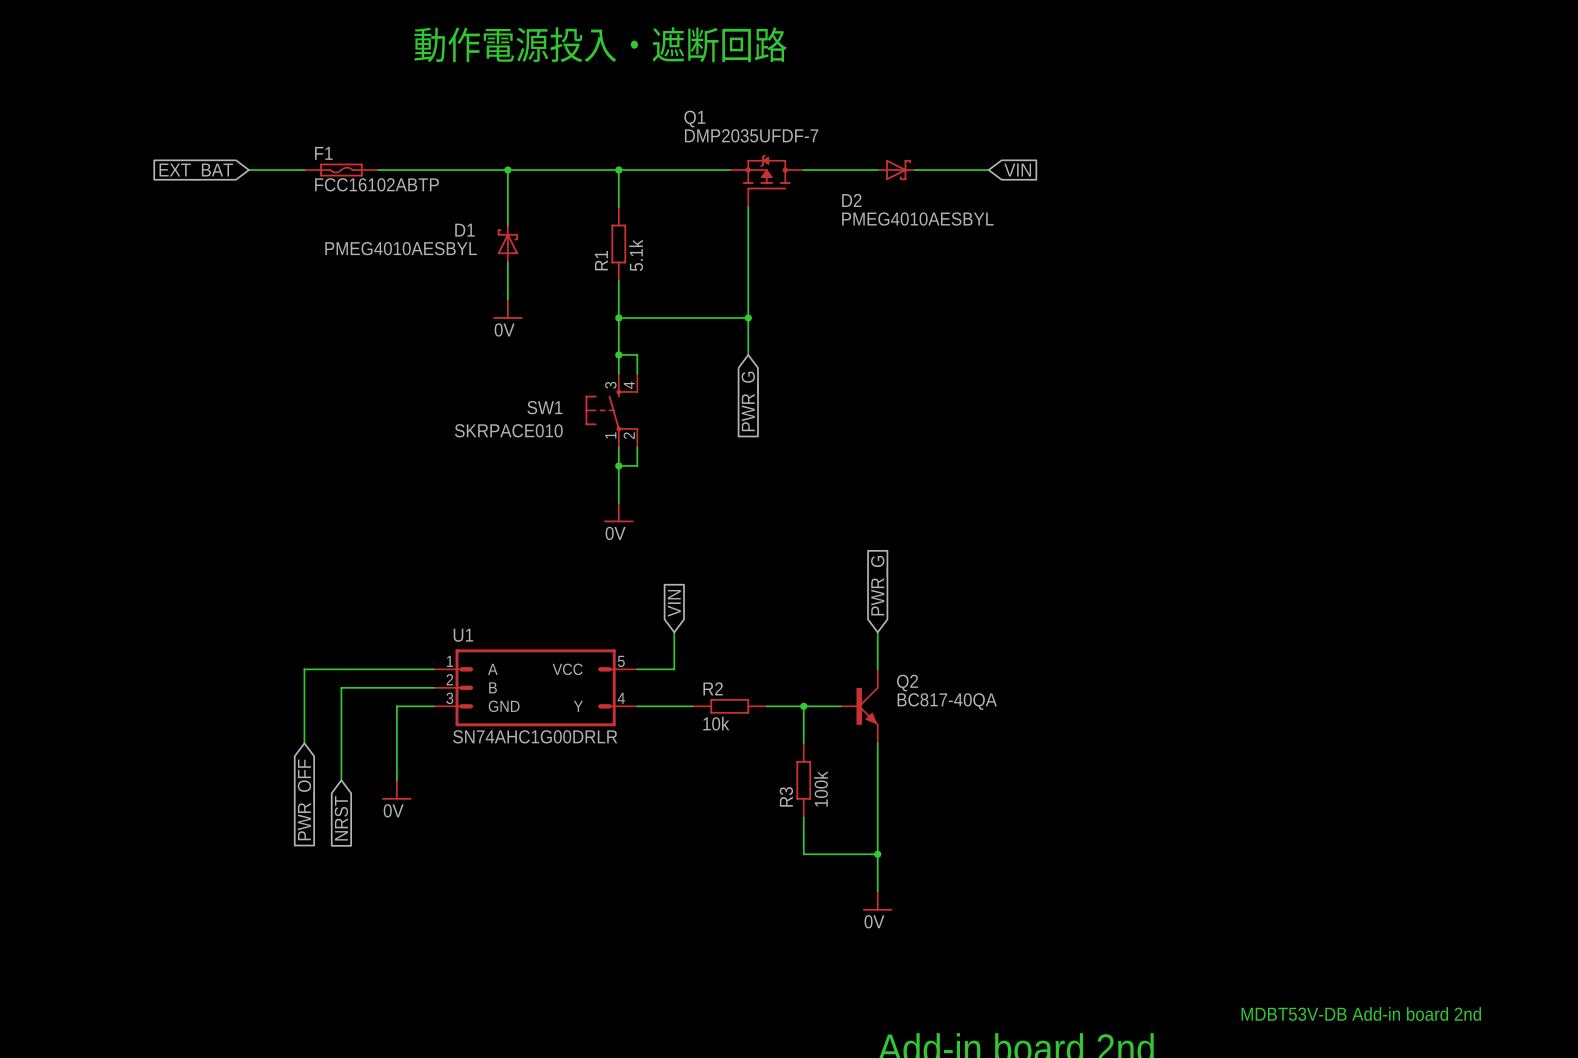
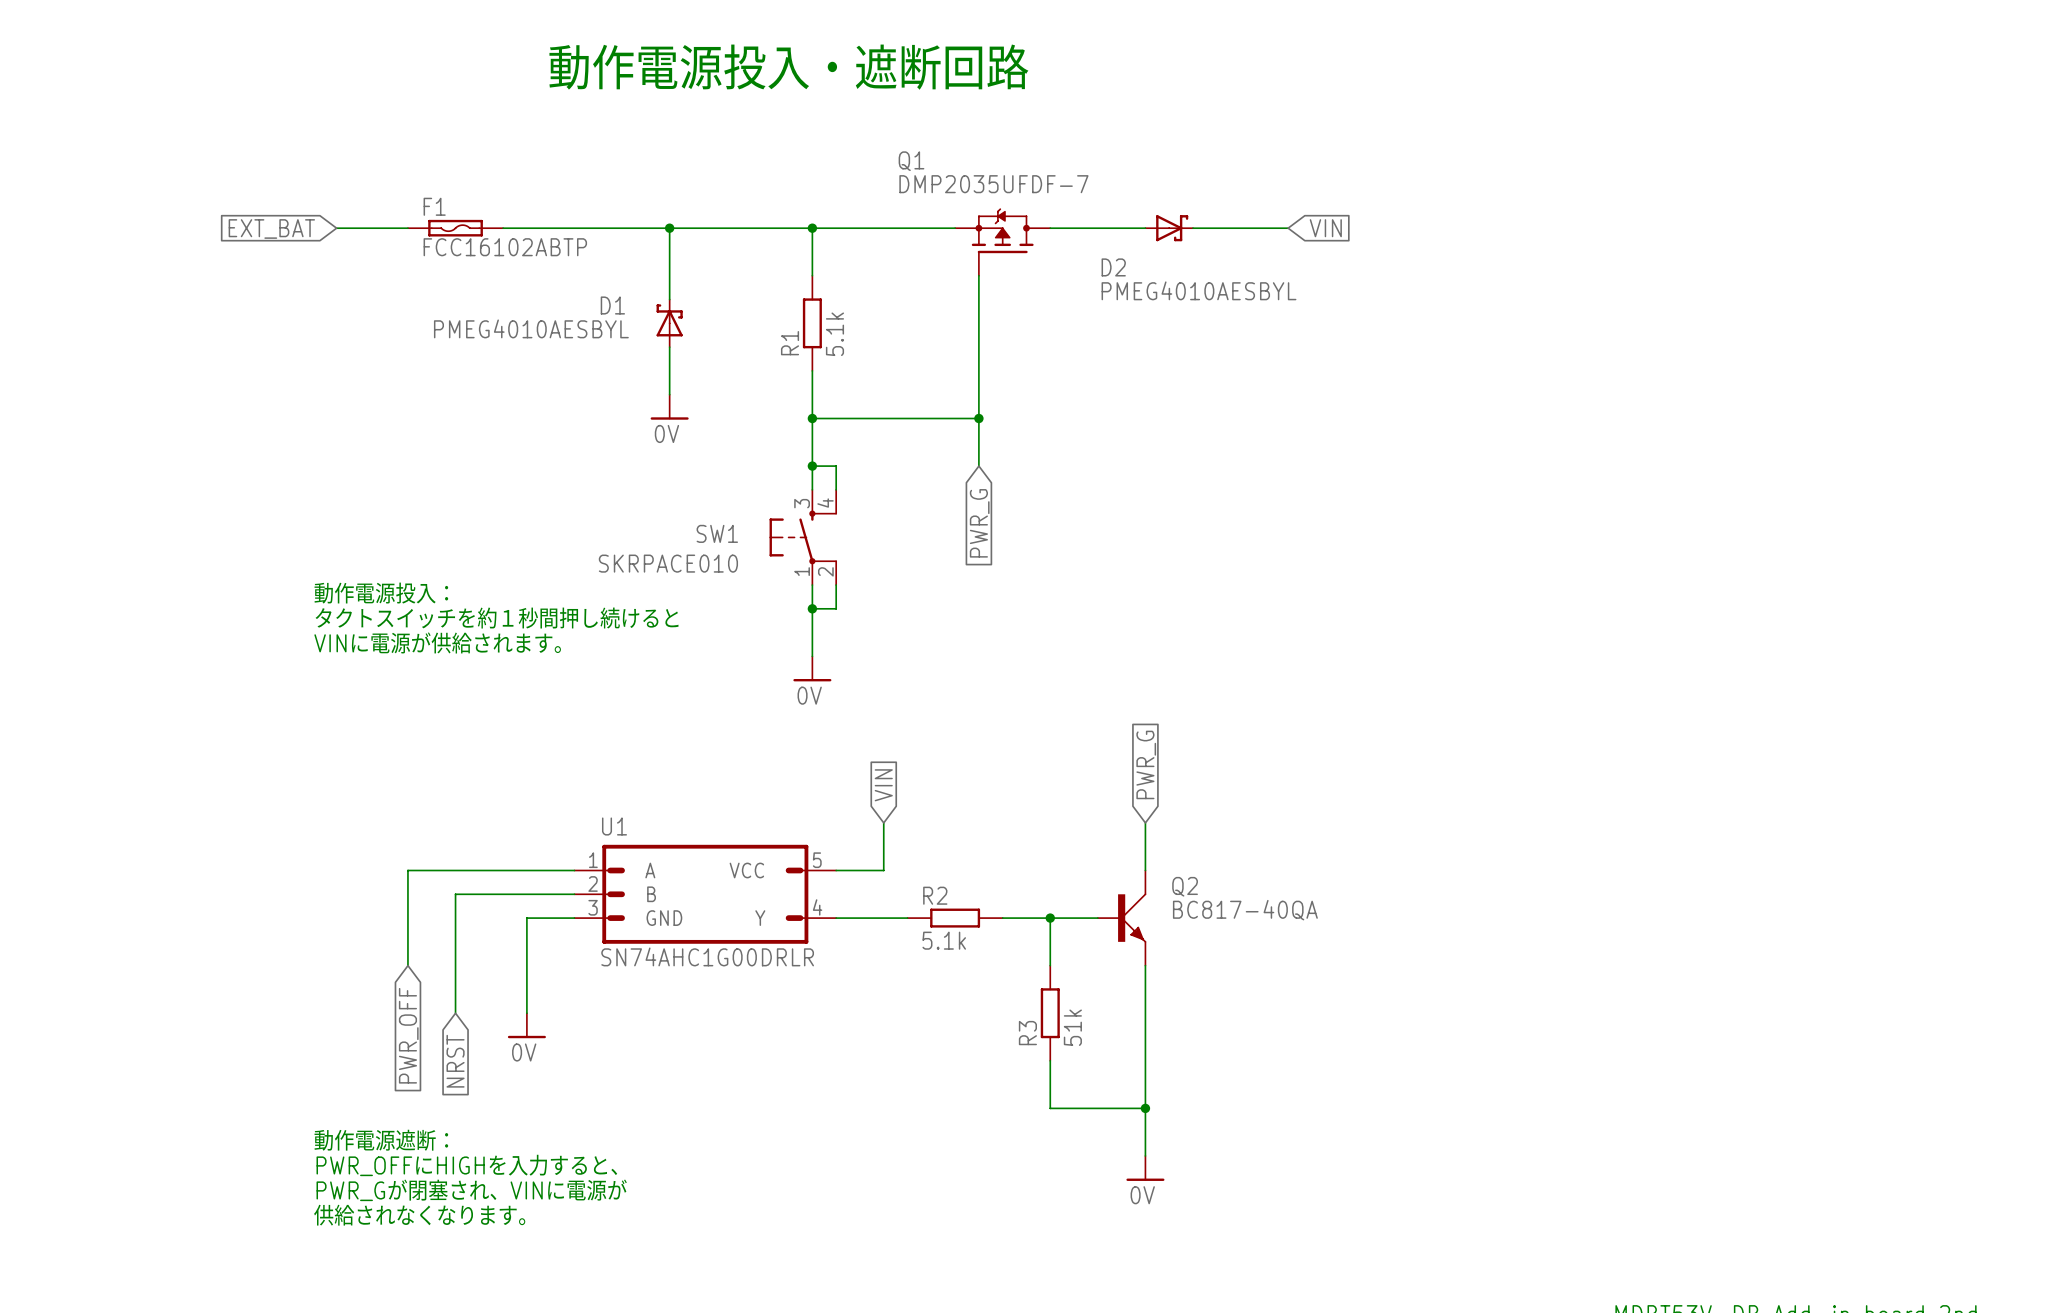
text: none -> 動作電源投入： (381, 593)
text: none -> タクトスイッチを約１秒間押し続けると (497, 618)
text: none -> VINに電源が供給されます。 (438, 642)
R2 value: 10k (716, 723) -> 5.1k (944, 940)
R3 value: 100k (821, 789) -> 51k (1072, 1027)
text: none -> 動作電源遮断： (381, 1140)
text: none -> PWR_OFFにHIGHを入力すると、 (467, 1165)
text: none -> PWR_Gが閉塞され、VINに電源が (472, 1190)
text: none -> 供給されなくなります。 (419, 1215)

